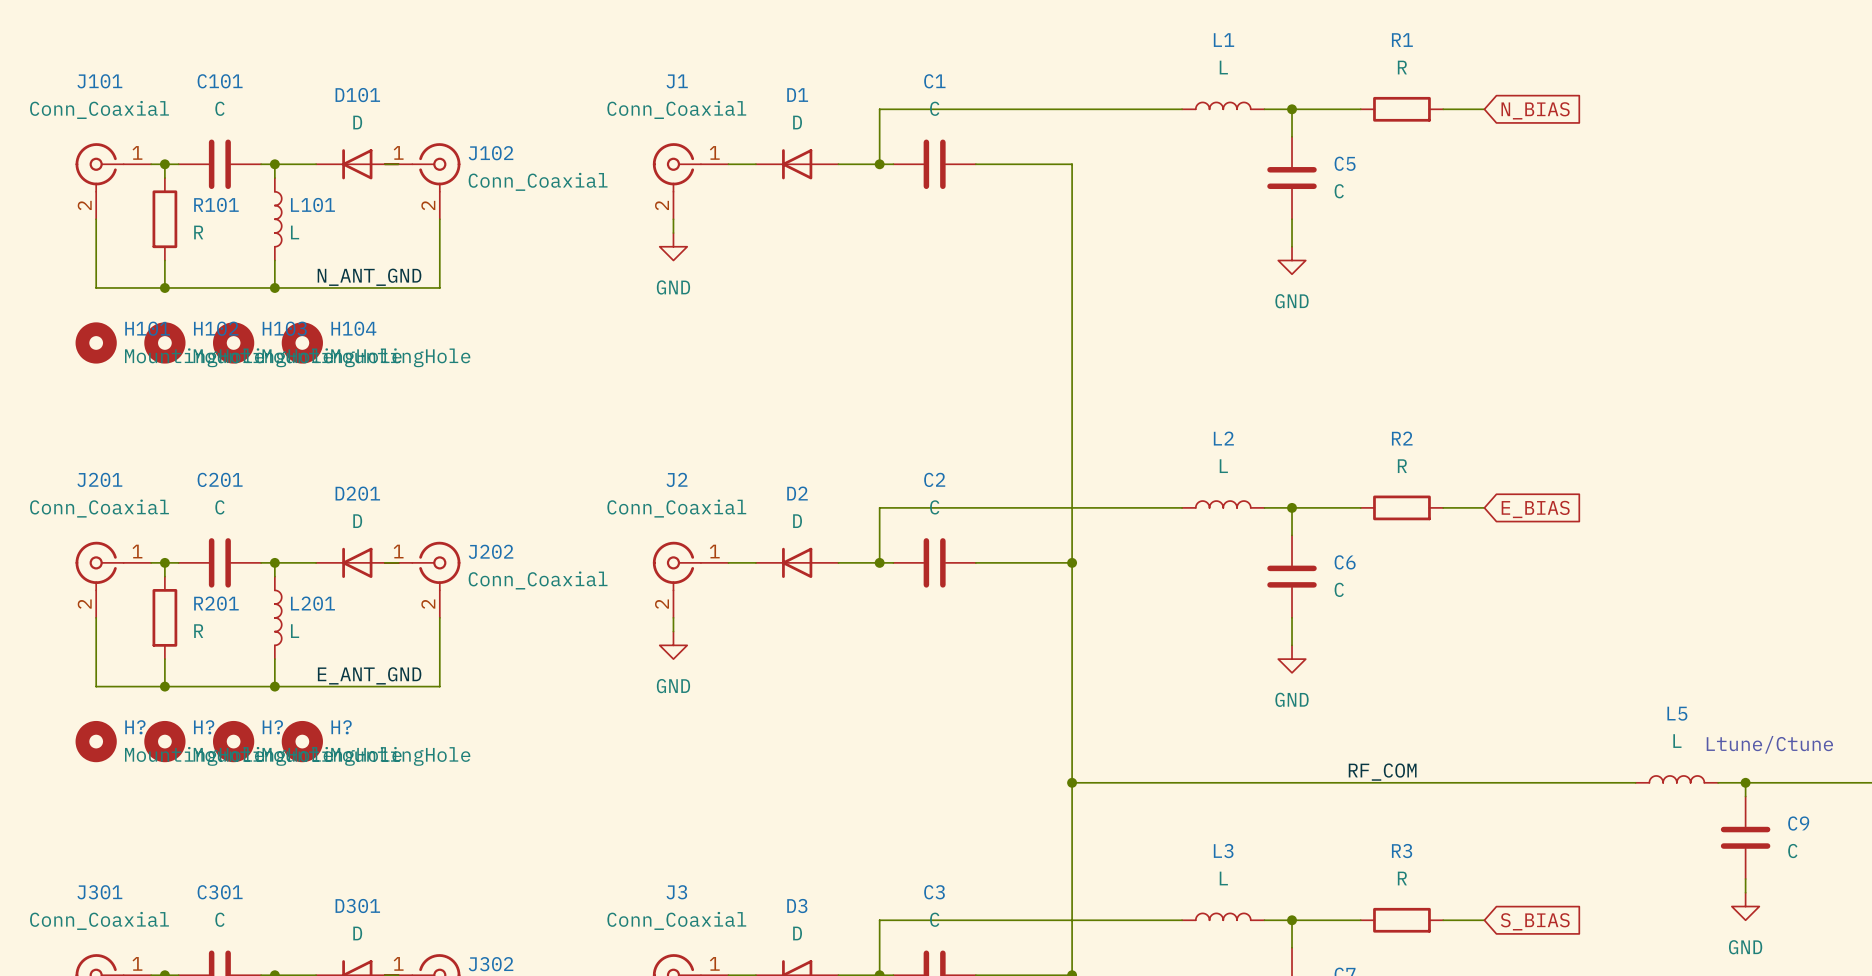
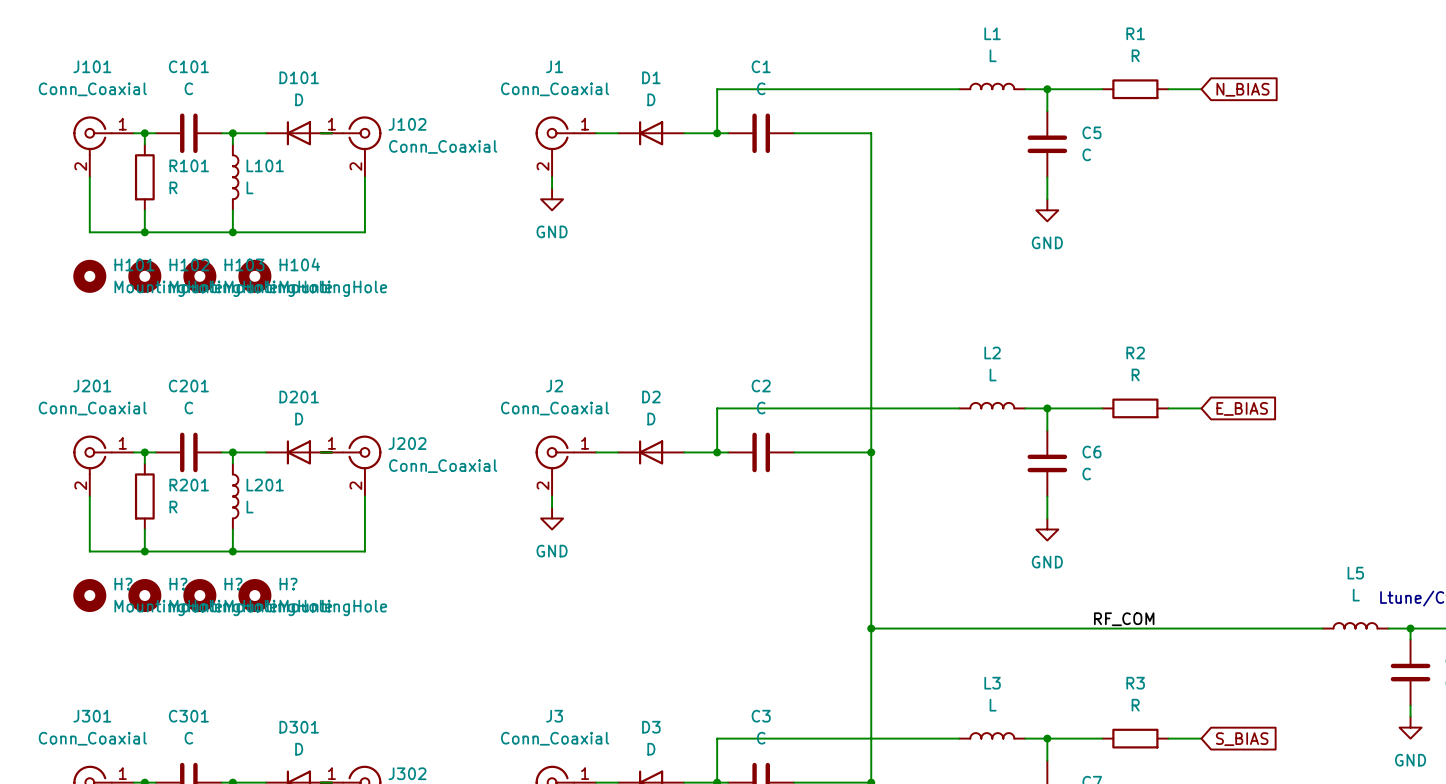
label: N_ANT_GND (369, 277) -> none
label: E_ANT_GND (369, 675) -> none

